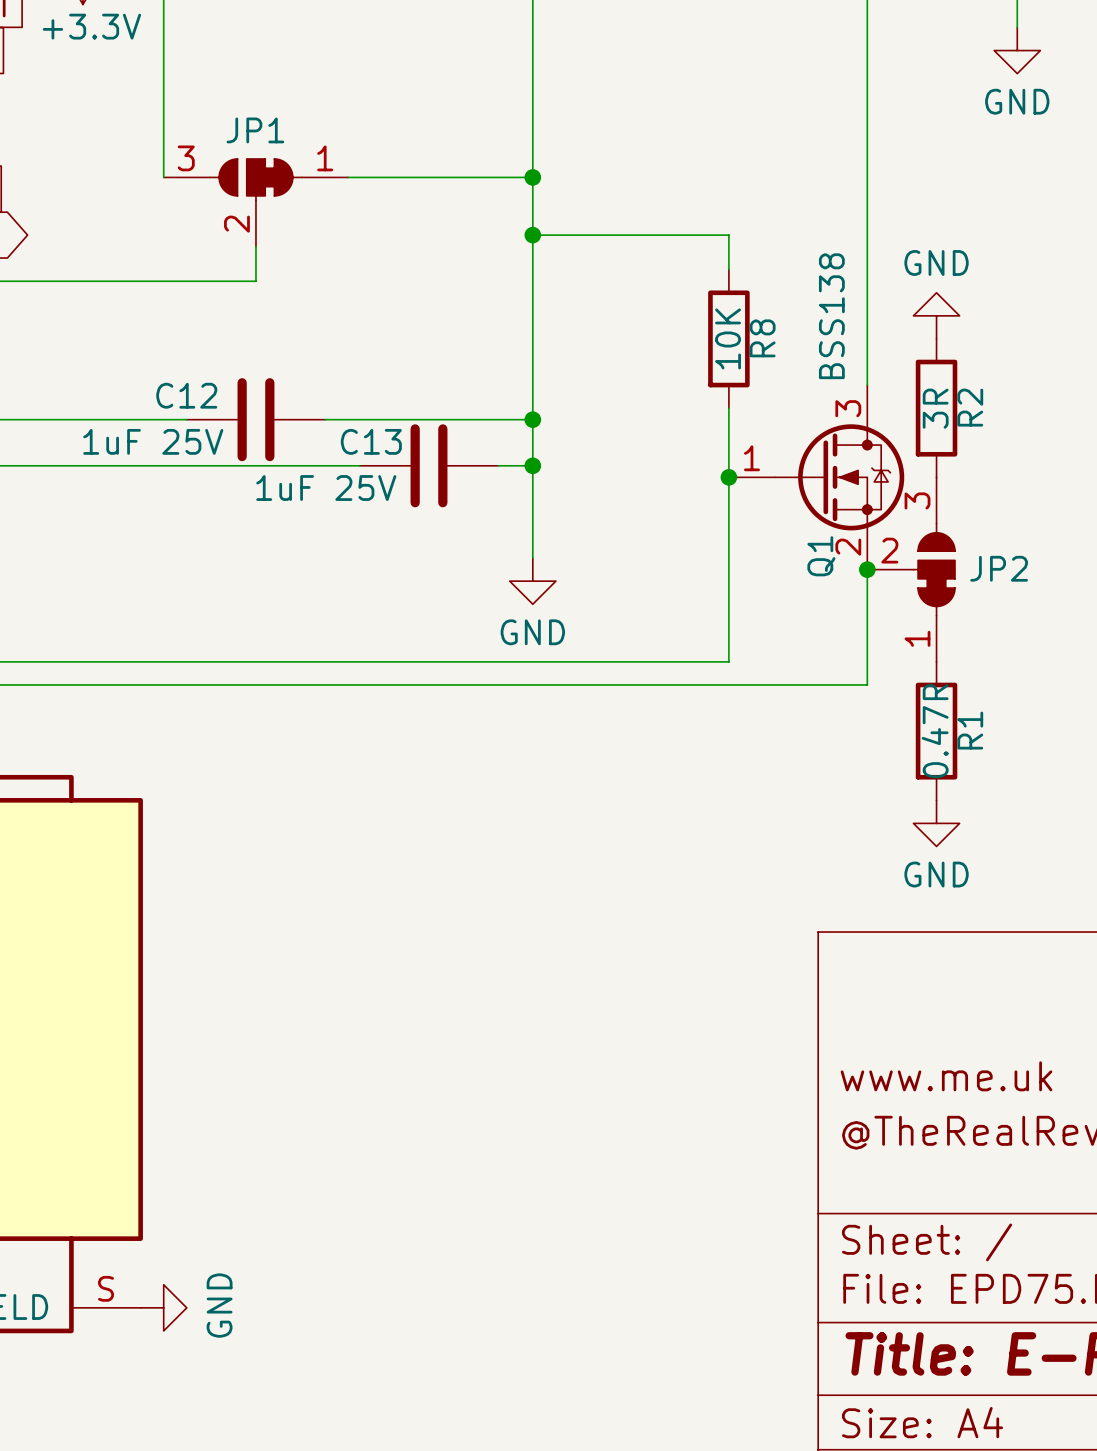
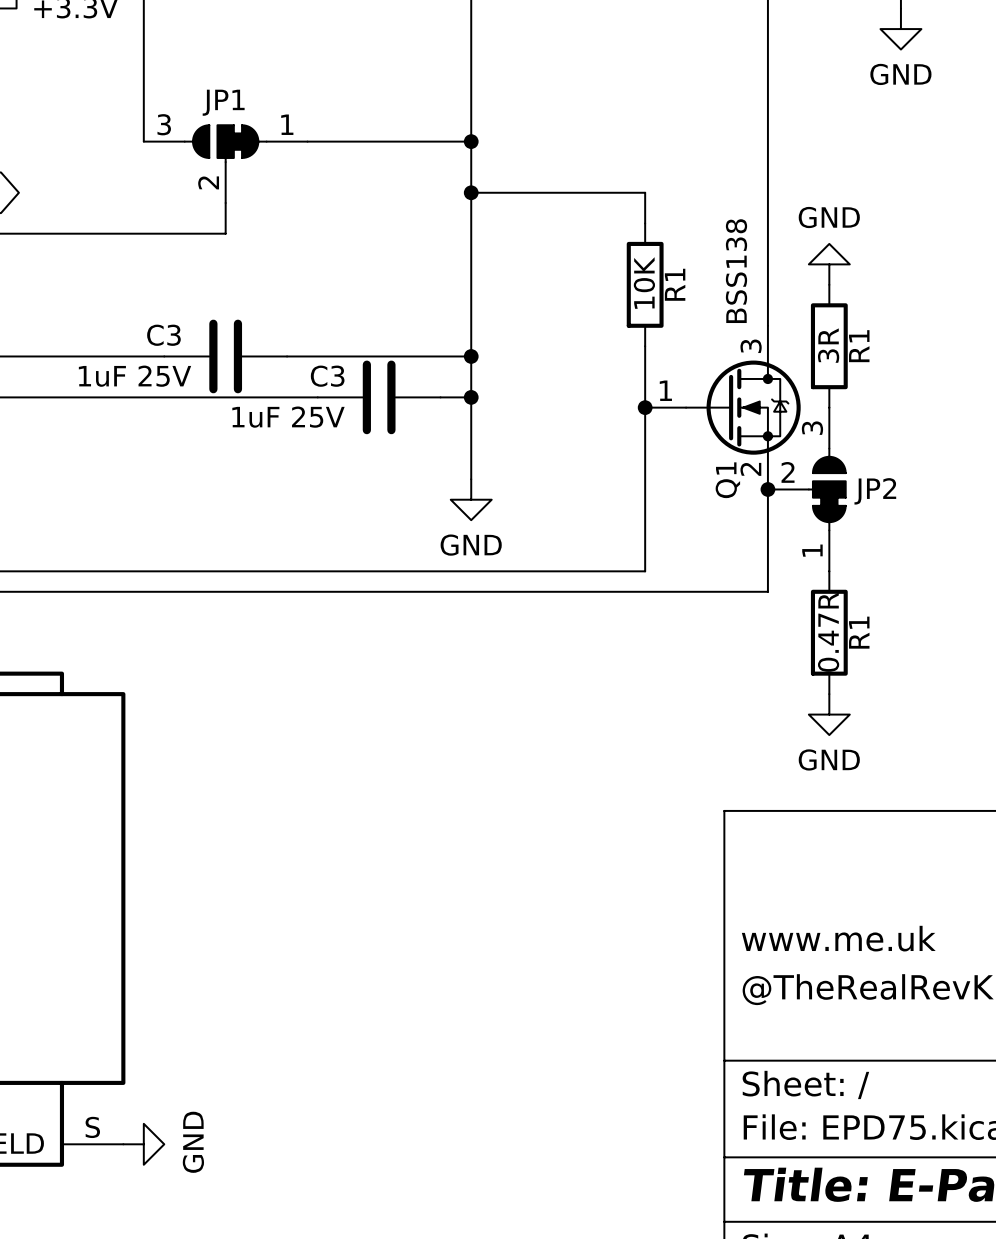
R8 name: R8 (762, 338) -> R1 (675, 284)
C12 name: C12 (186, 395) -> C3 (163, 335)
R2 name: R2 (970, 407) -> R1 (859, 346)
C13 name: C13 (371, 441) -> C3 (327, 376)

